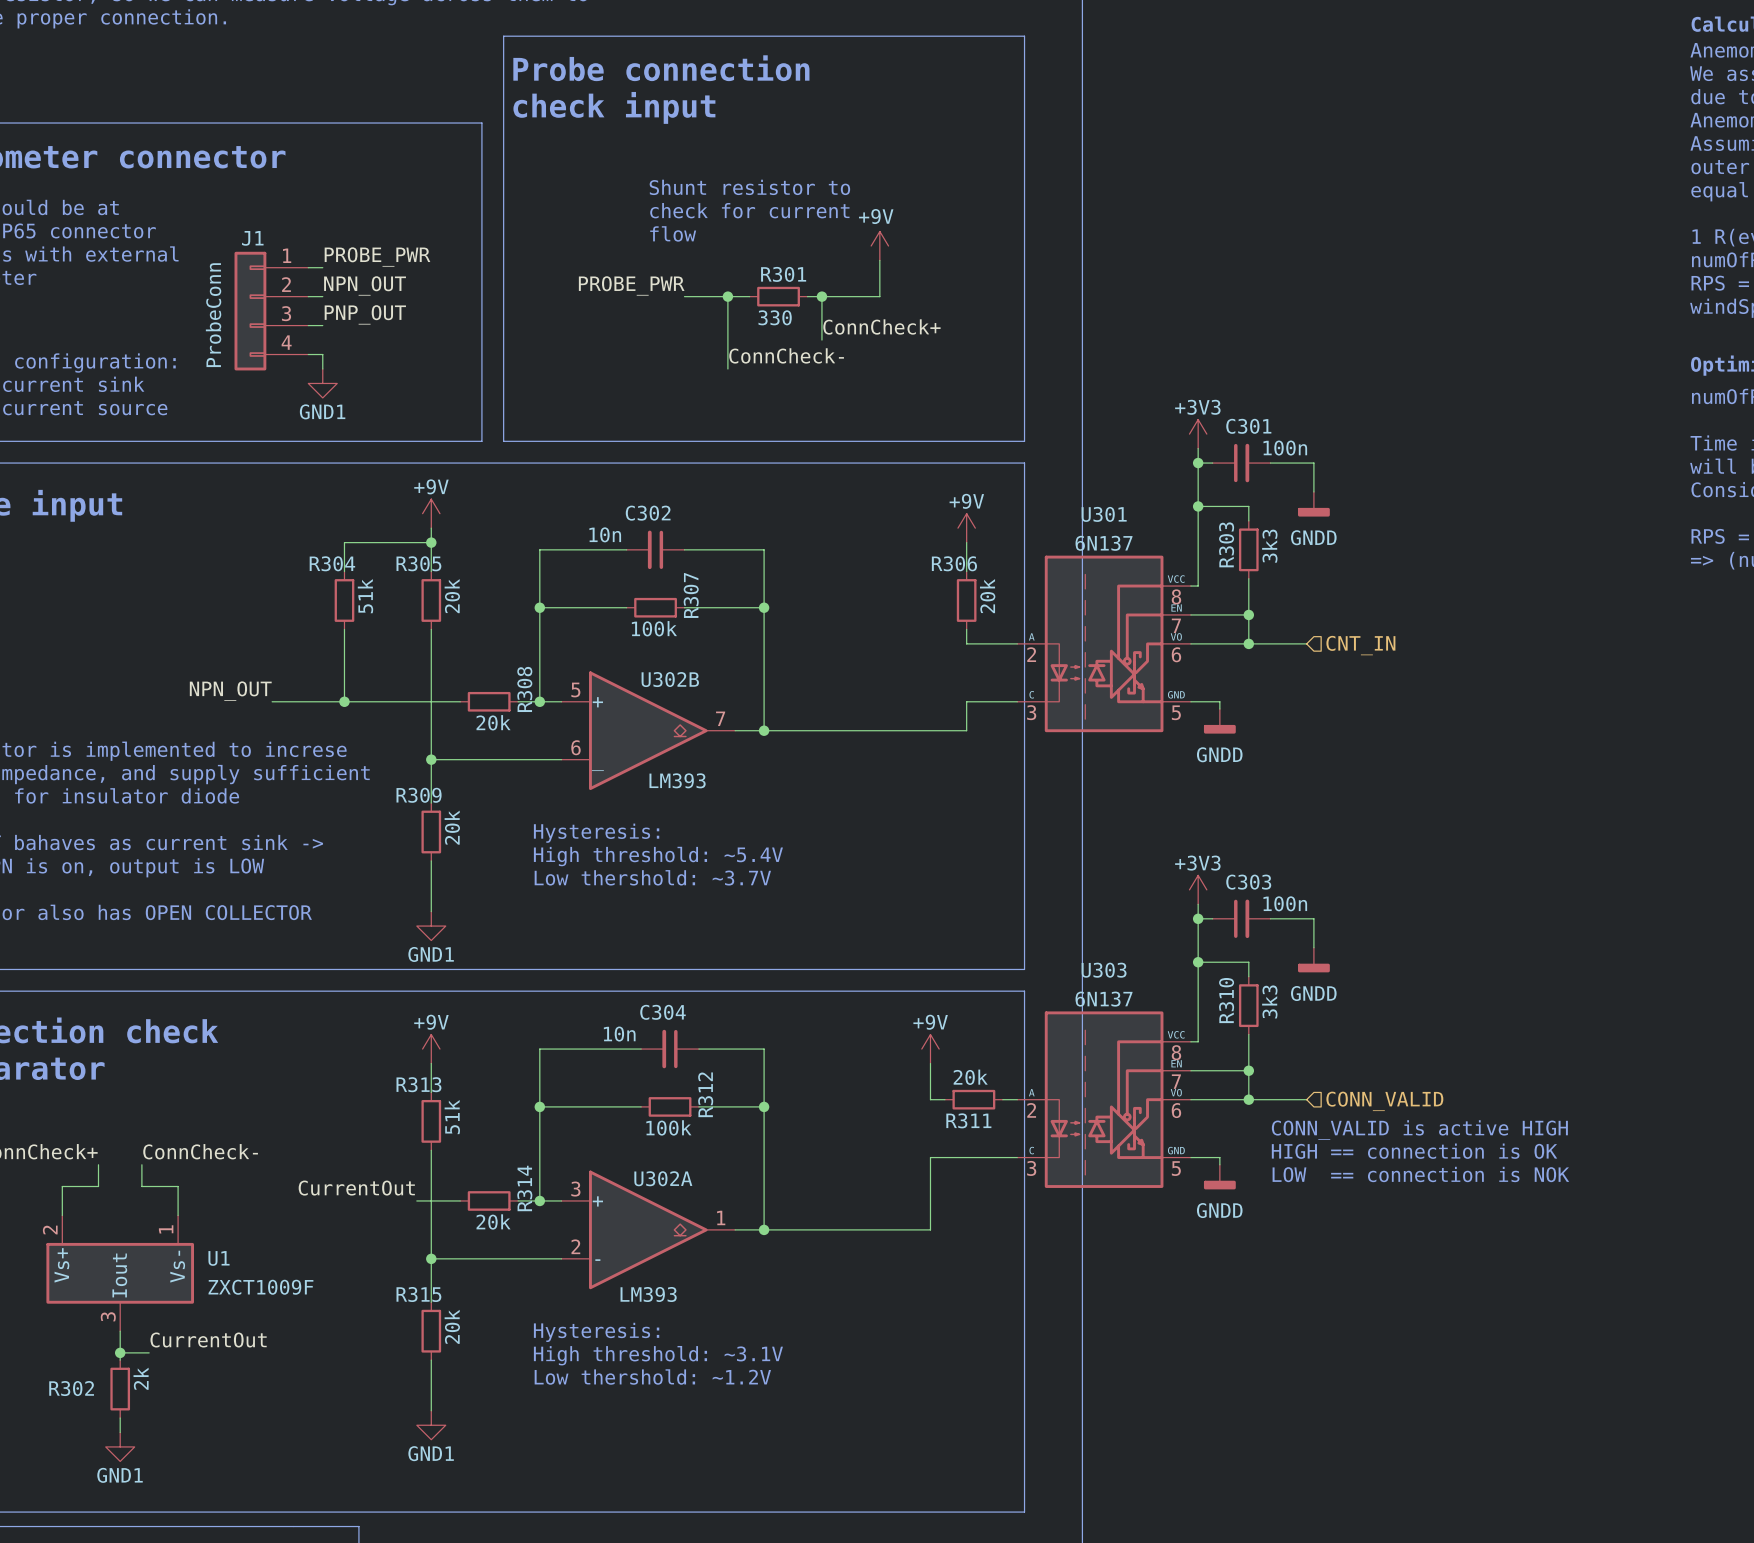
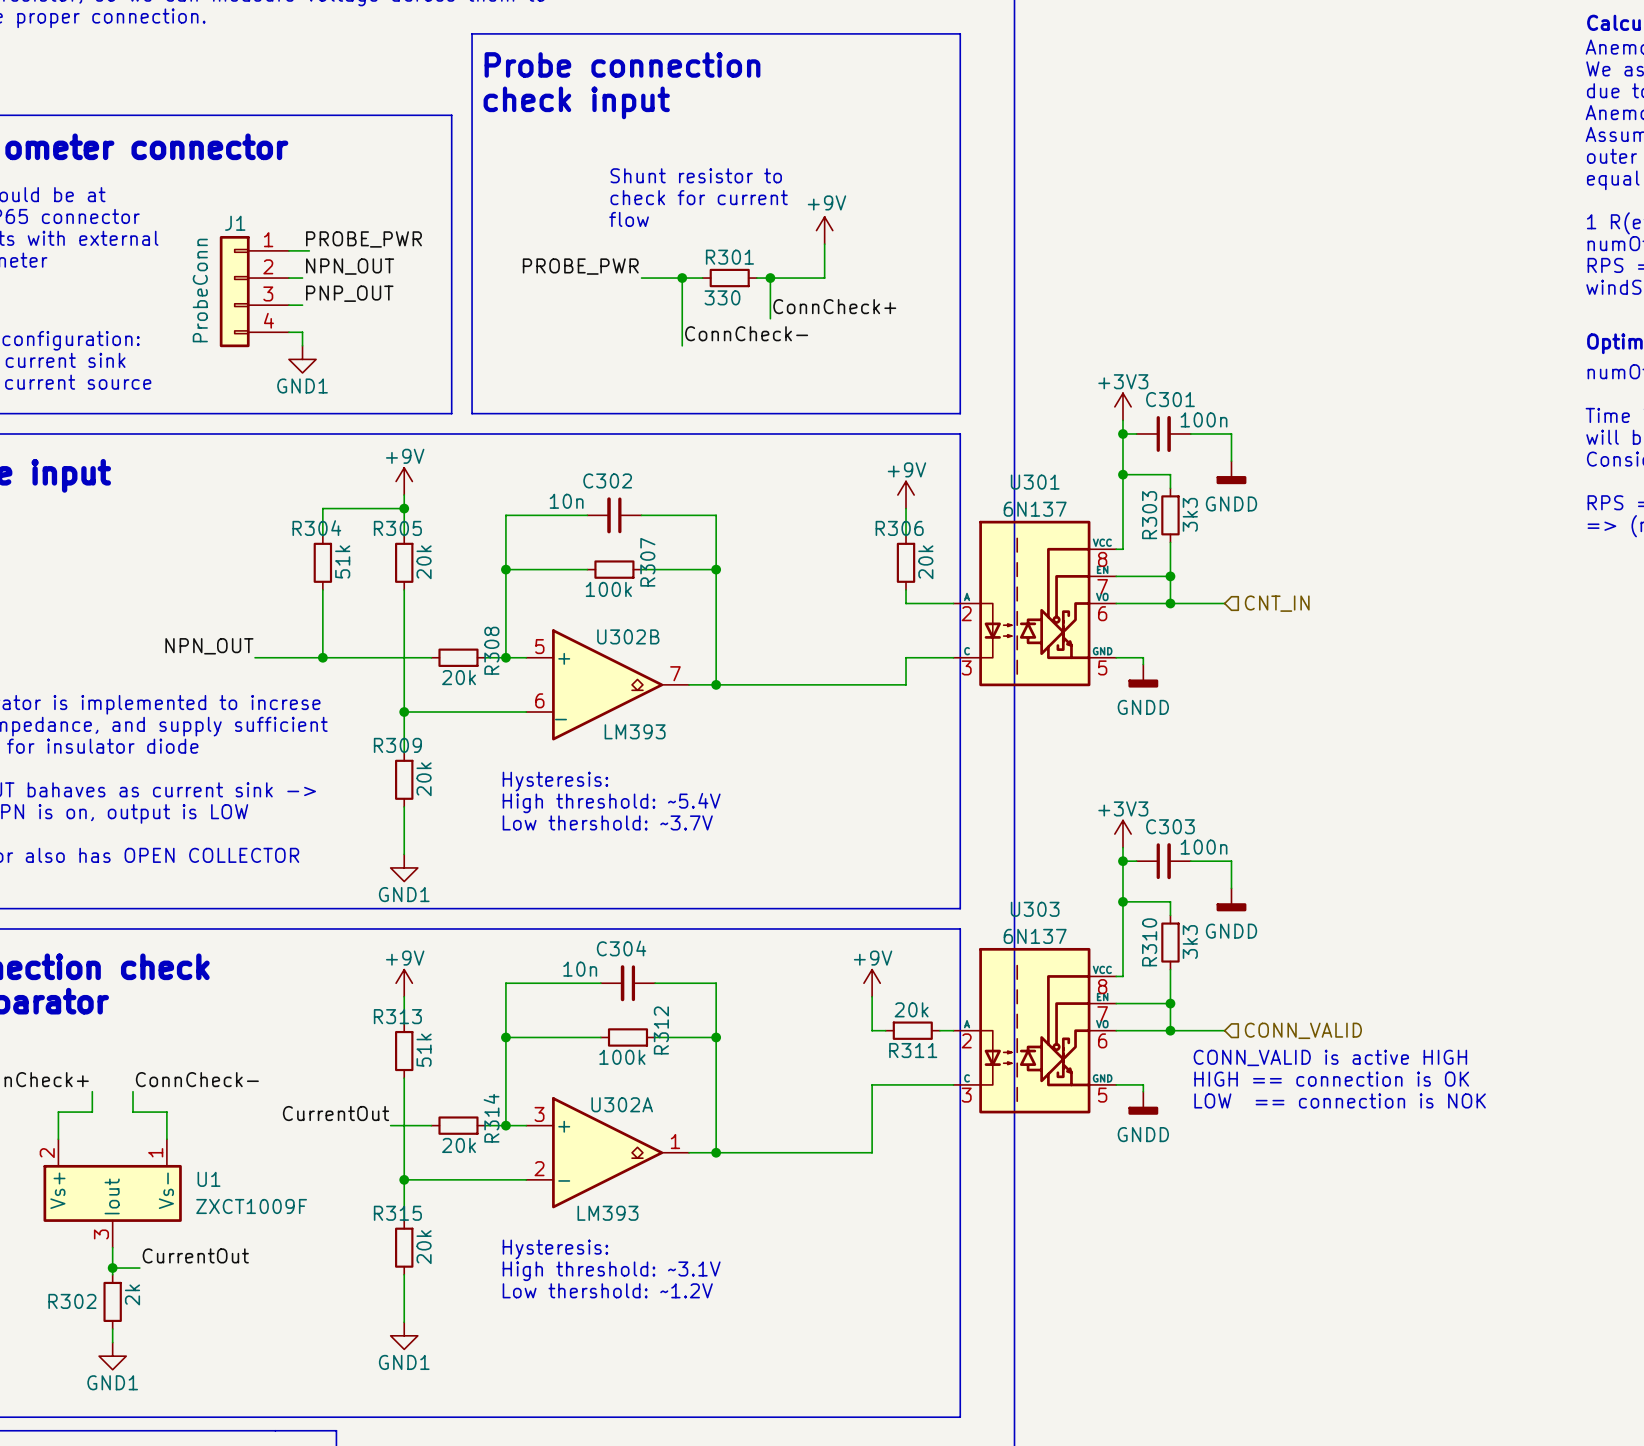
wire: none -> (302, 250) (309, 250)

